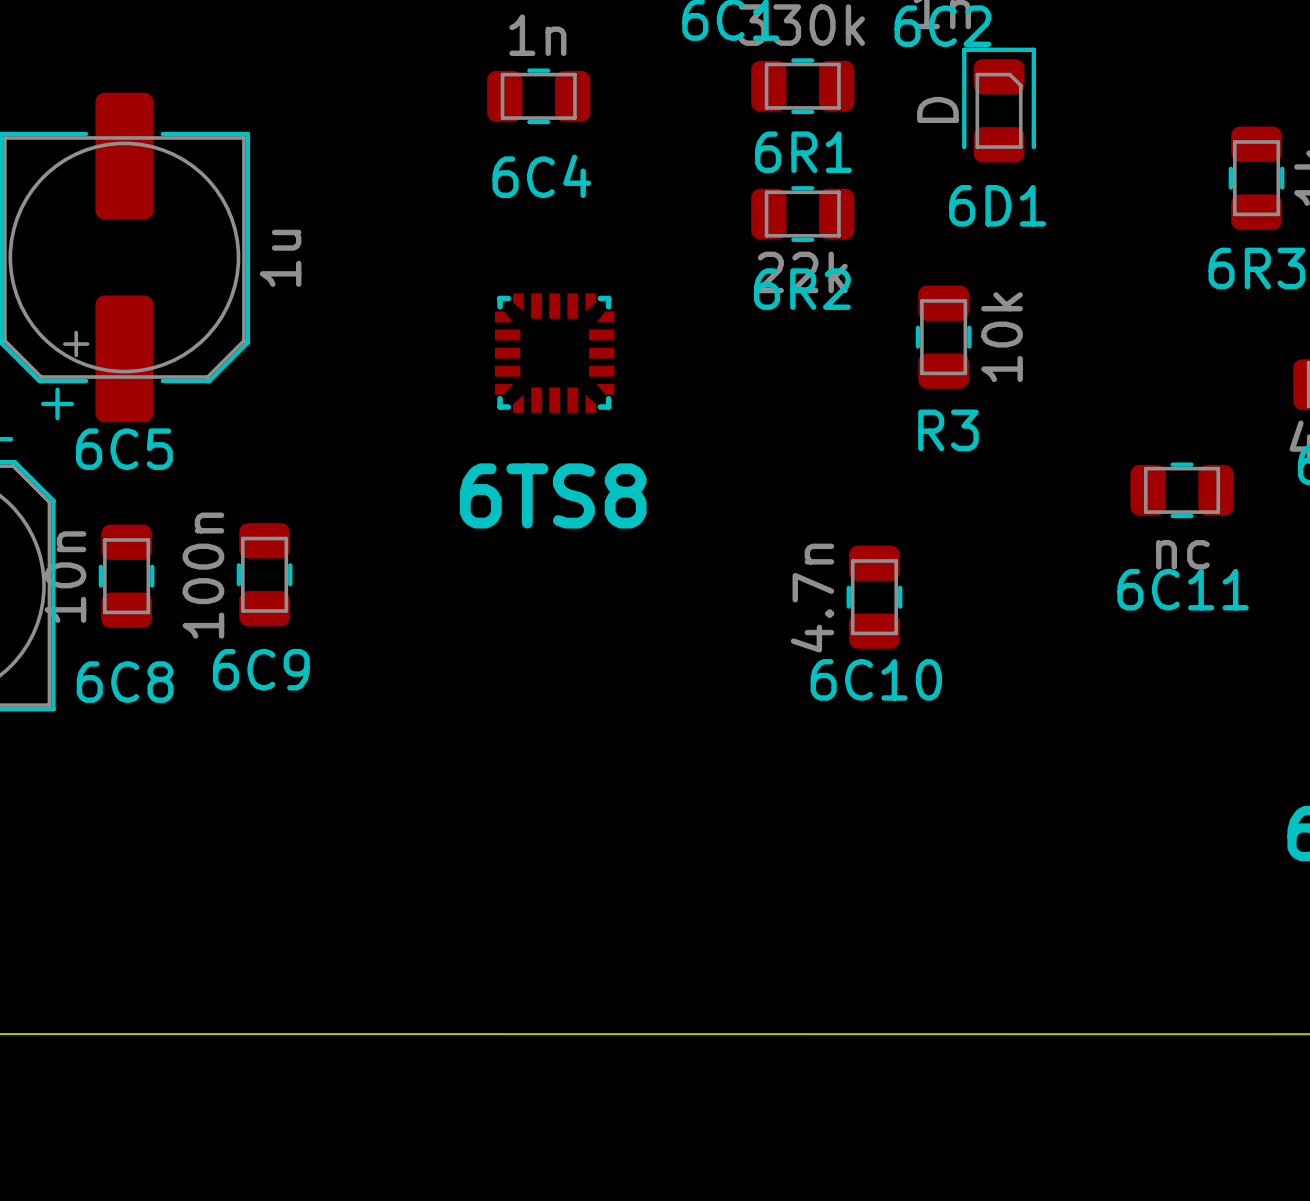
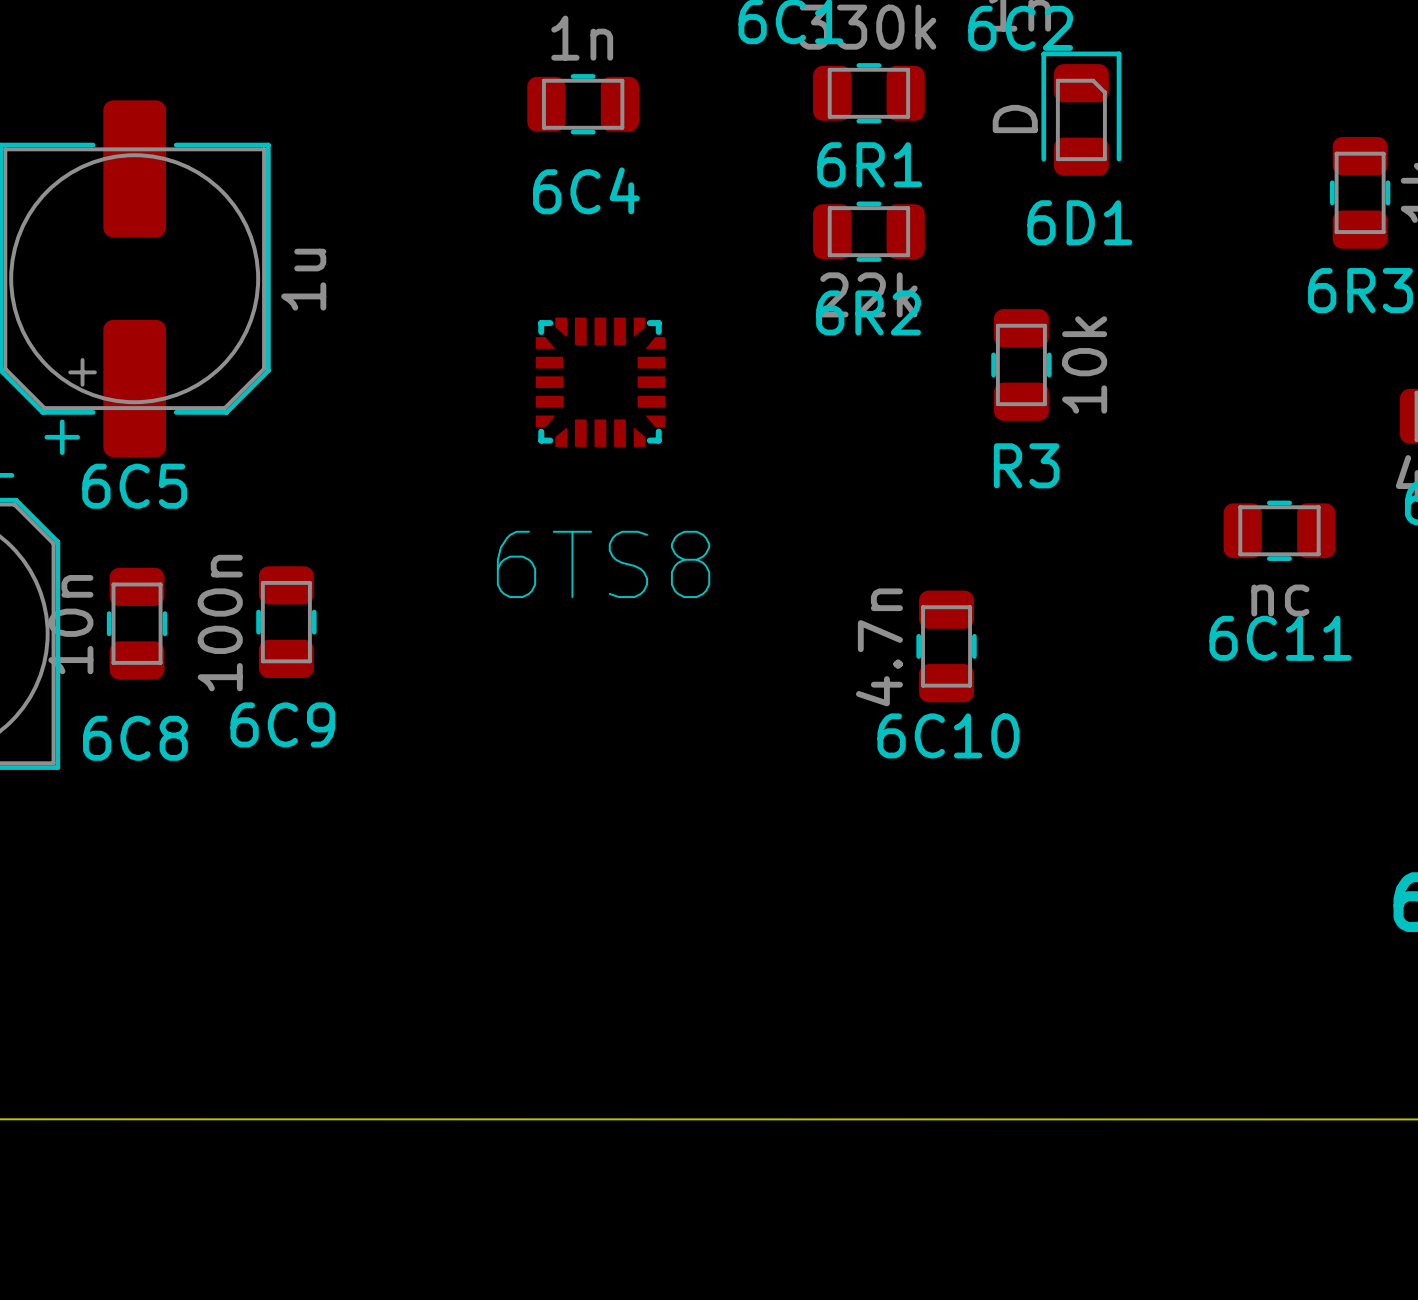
text: 6TS8 (553, 495) -> none
6TS8 name: none -> 6TS8 (603, 564)

